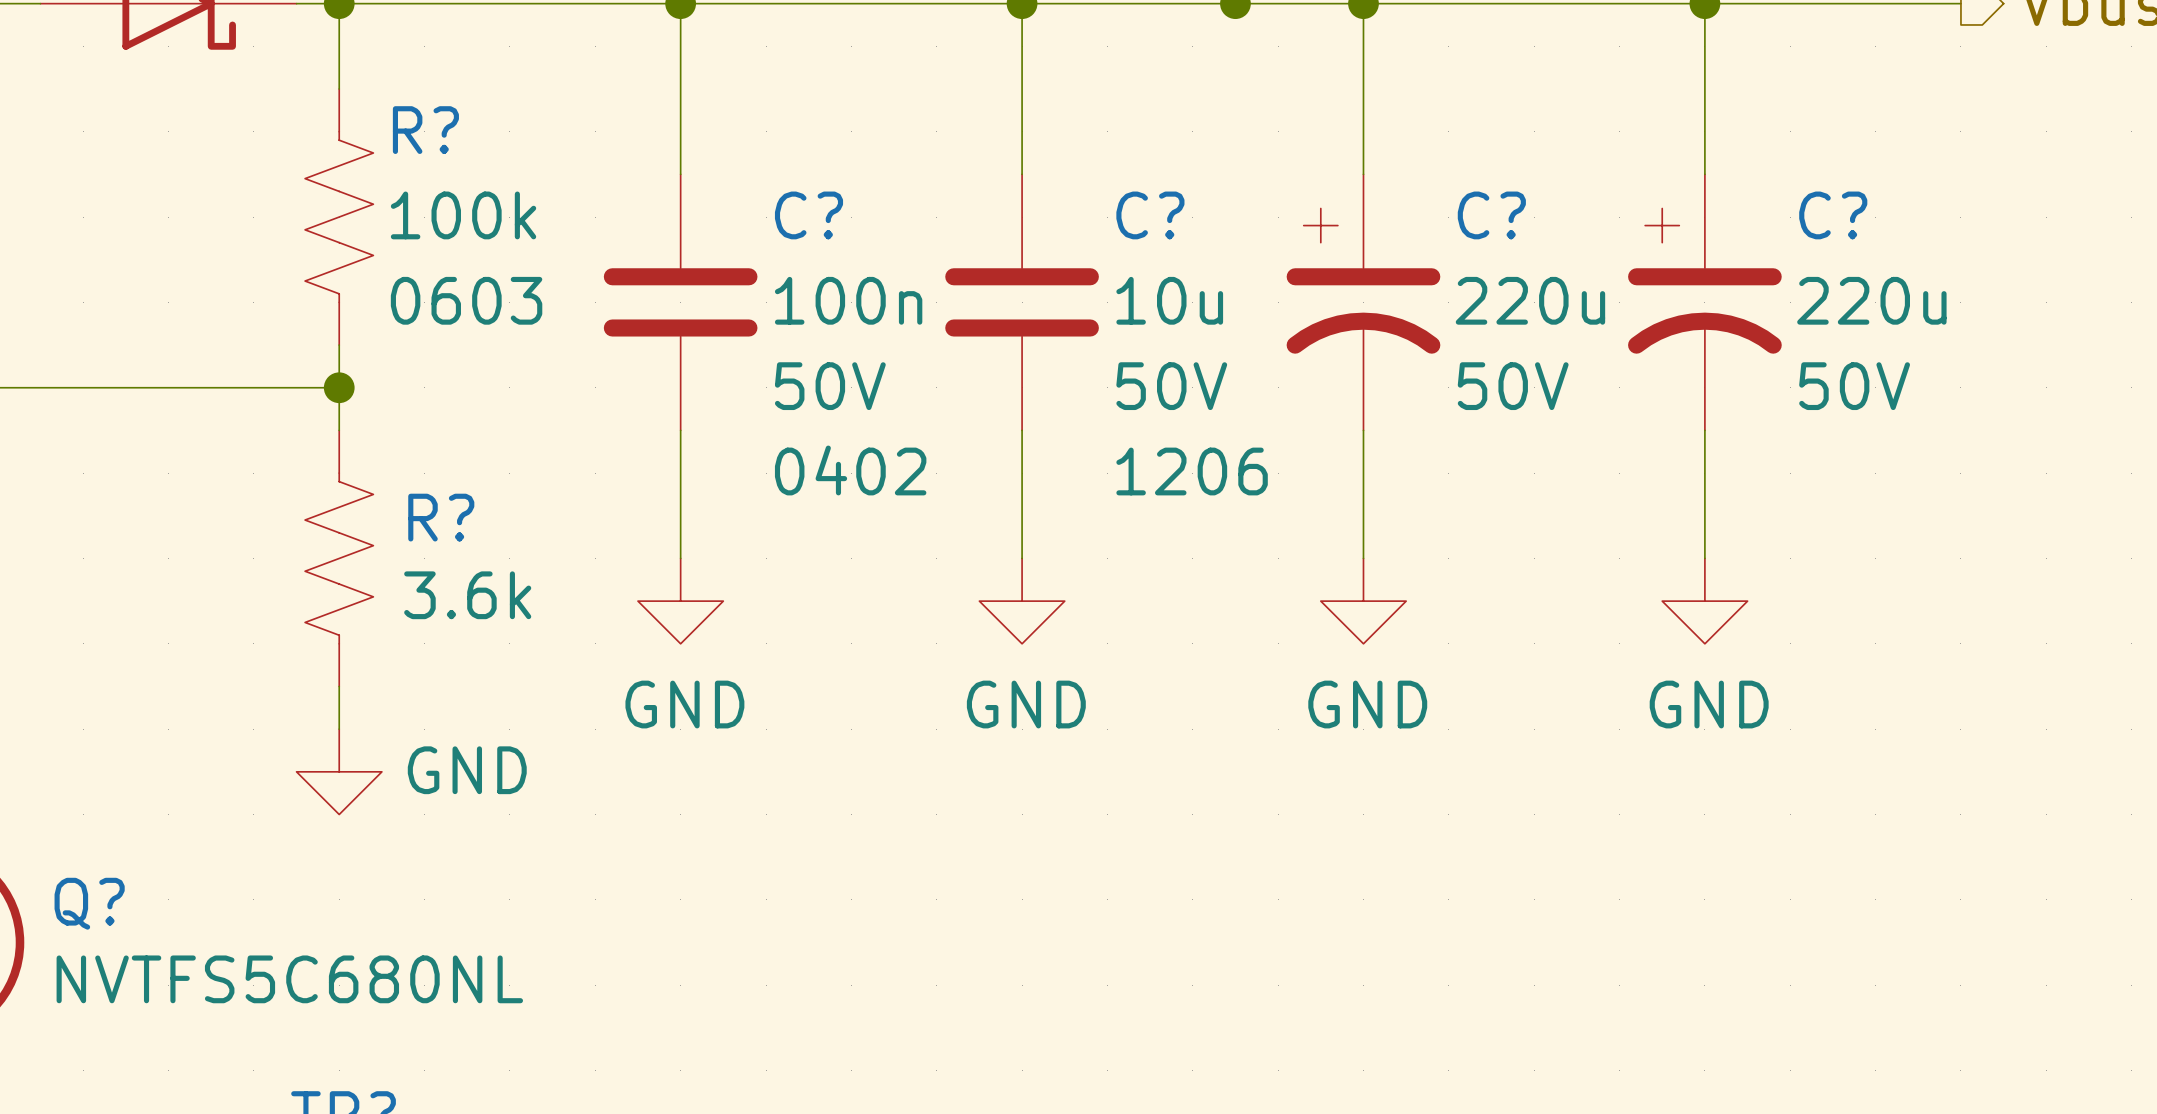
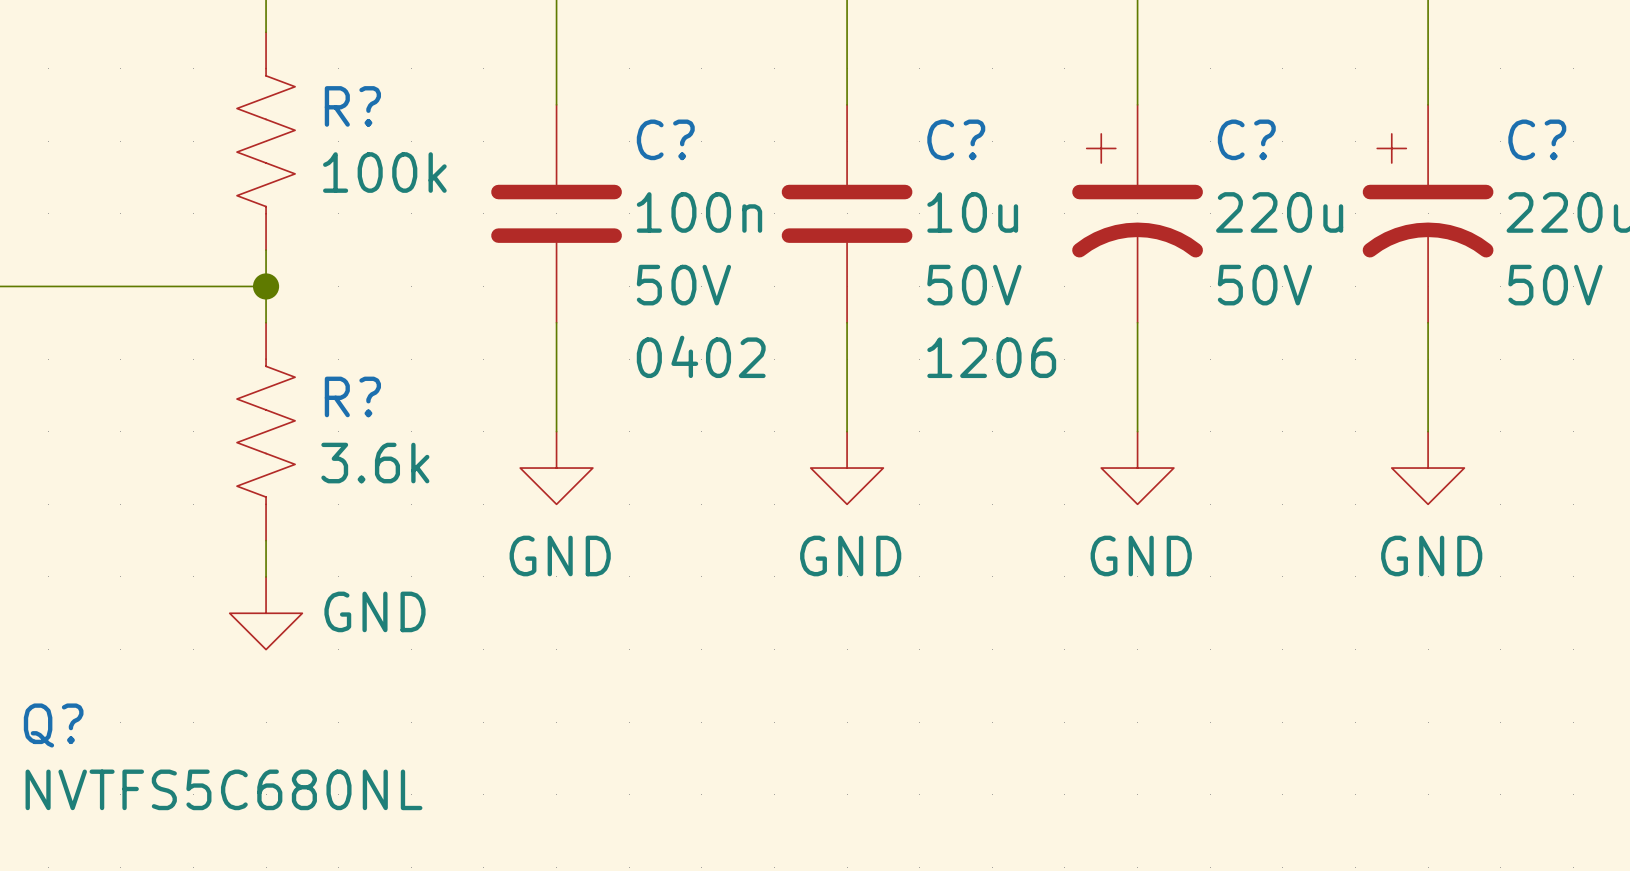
R? name position: R? (425, 130) -> R? (352, 106)
R? value position: 100k (463, 215) -> 100k (384, 172)
R? text: 0603 (466, 300) -> none

